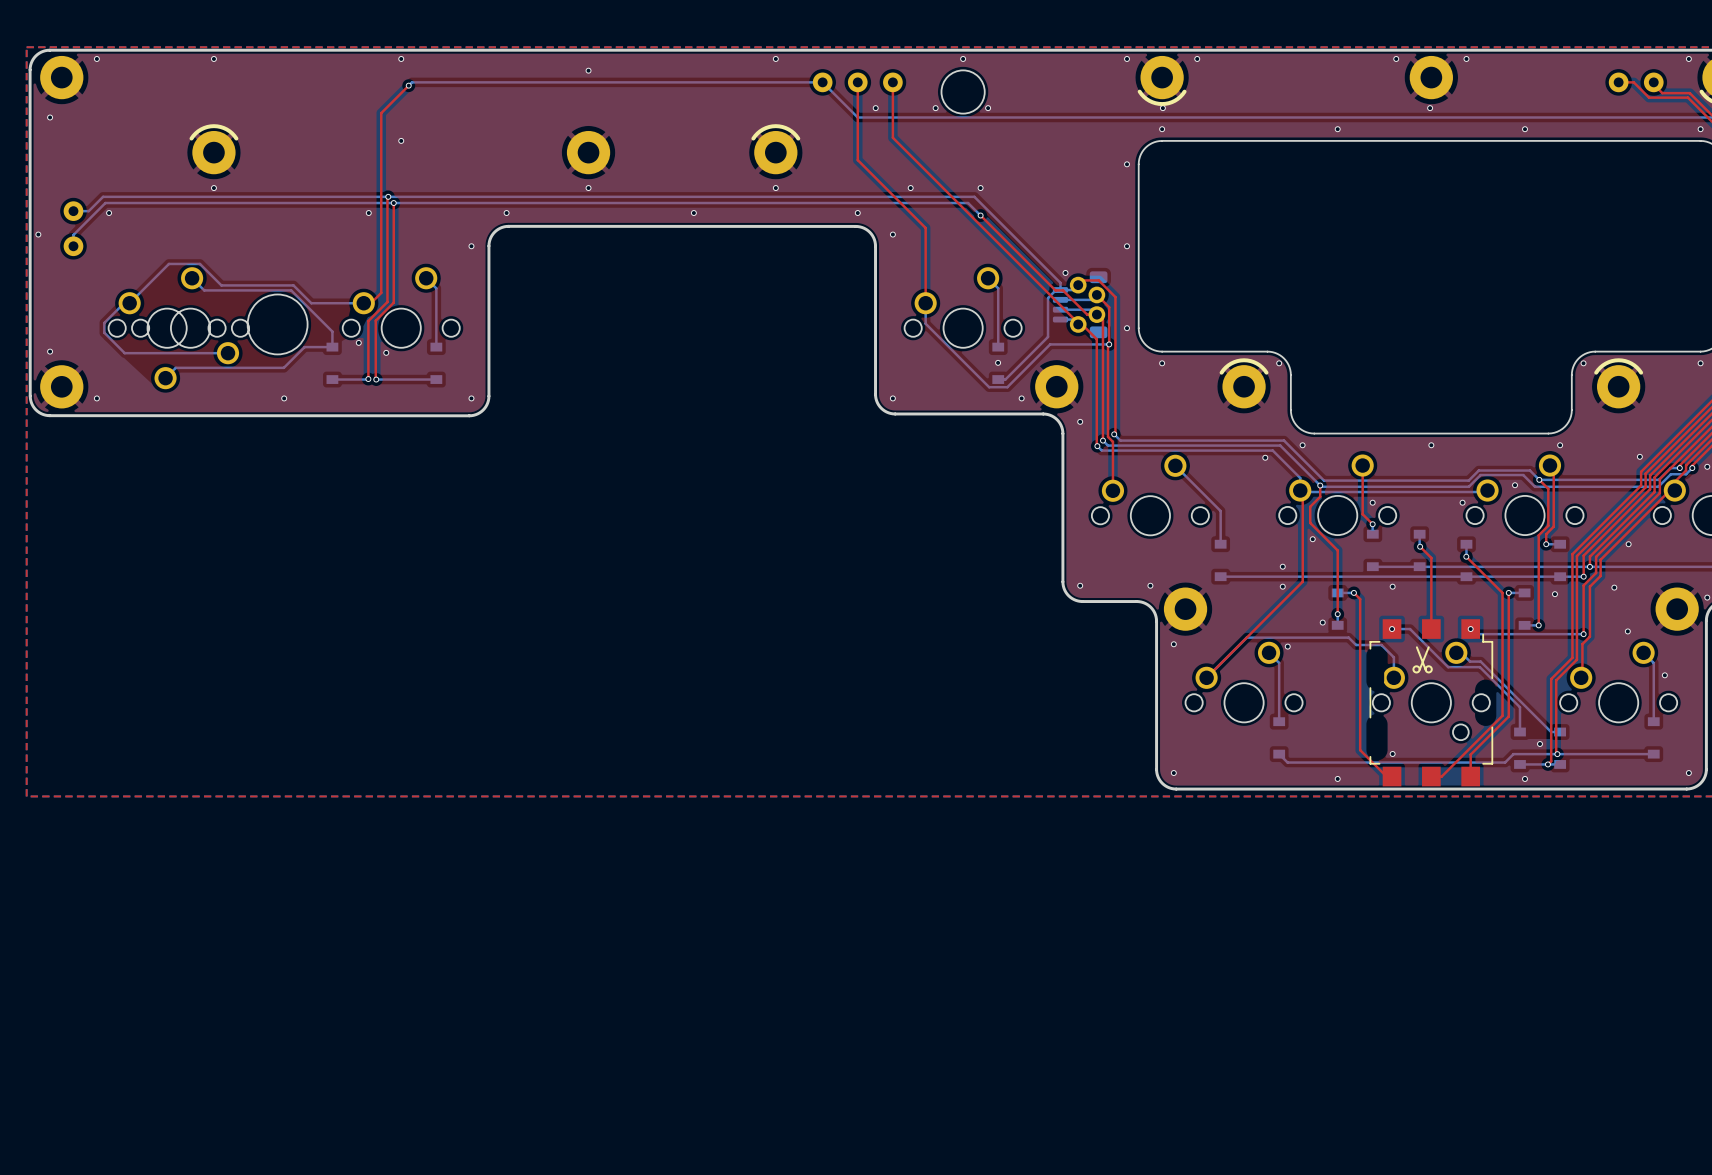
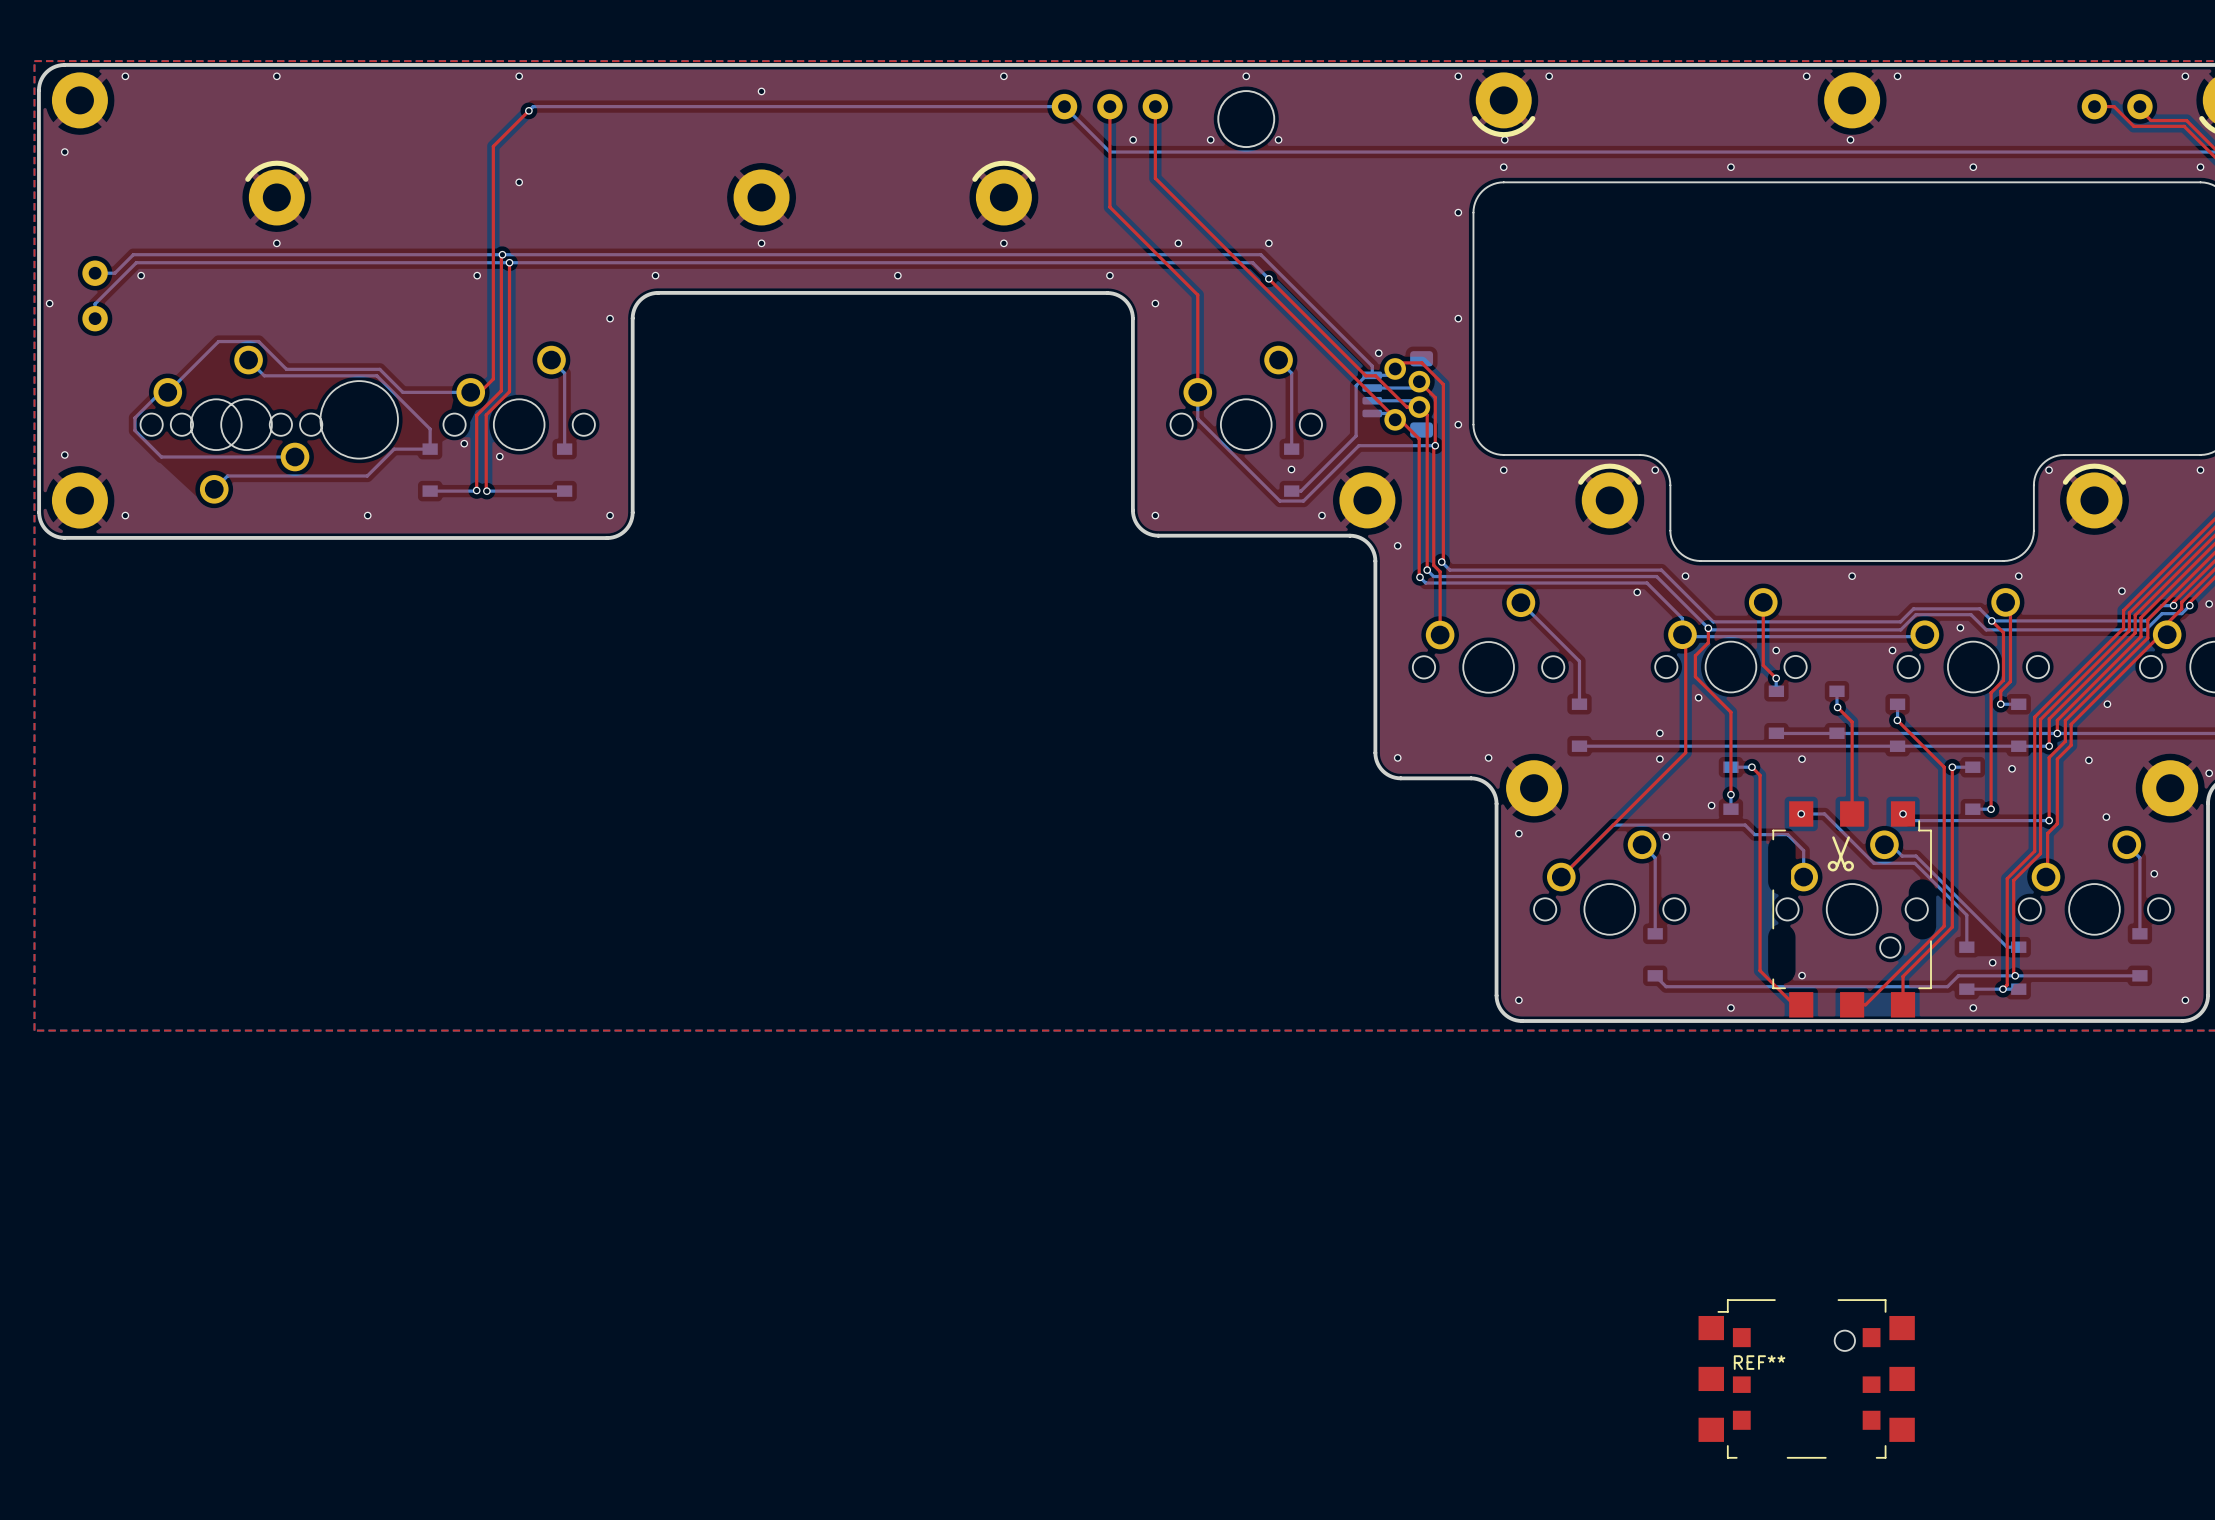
REF**: none -> (1806, 1378)

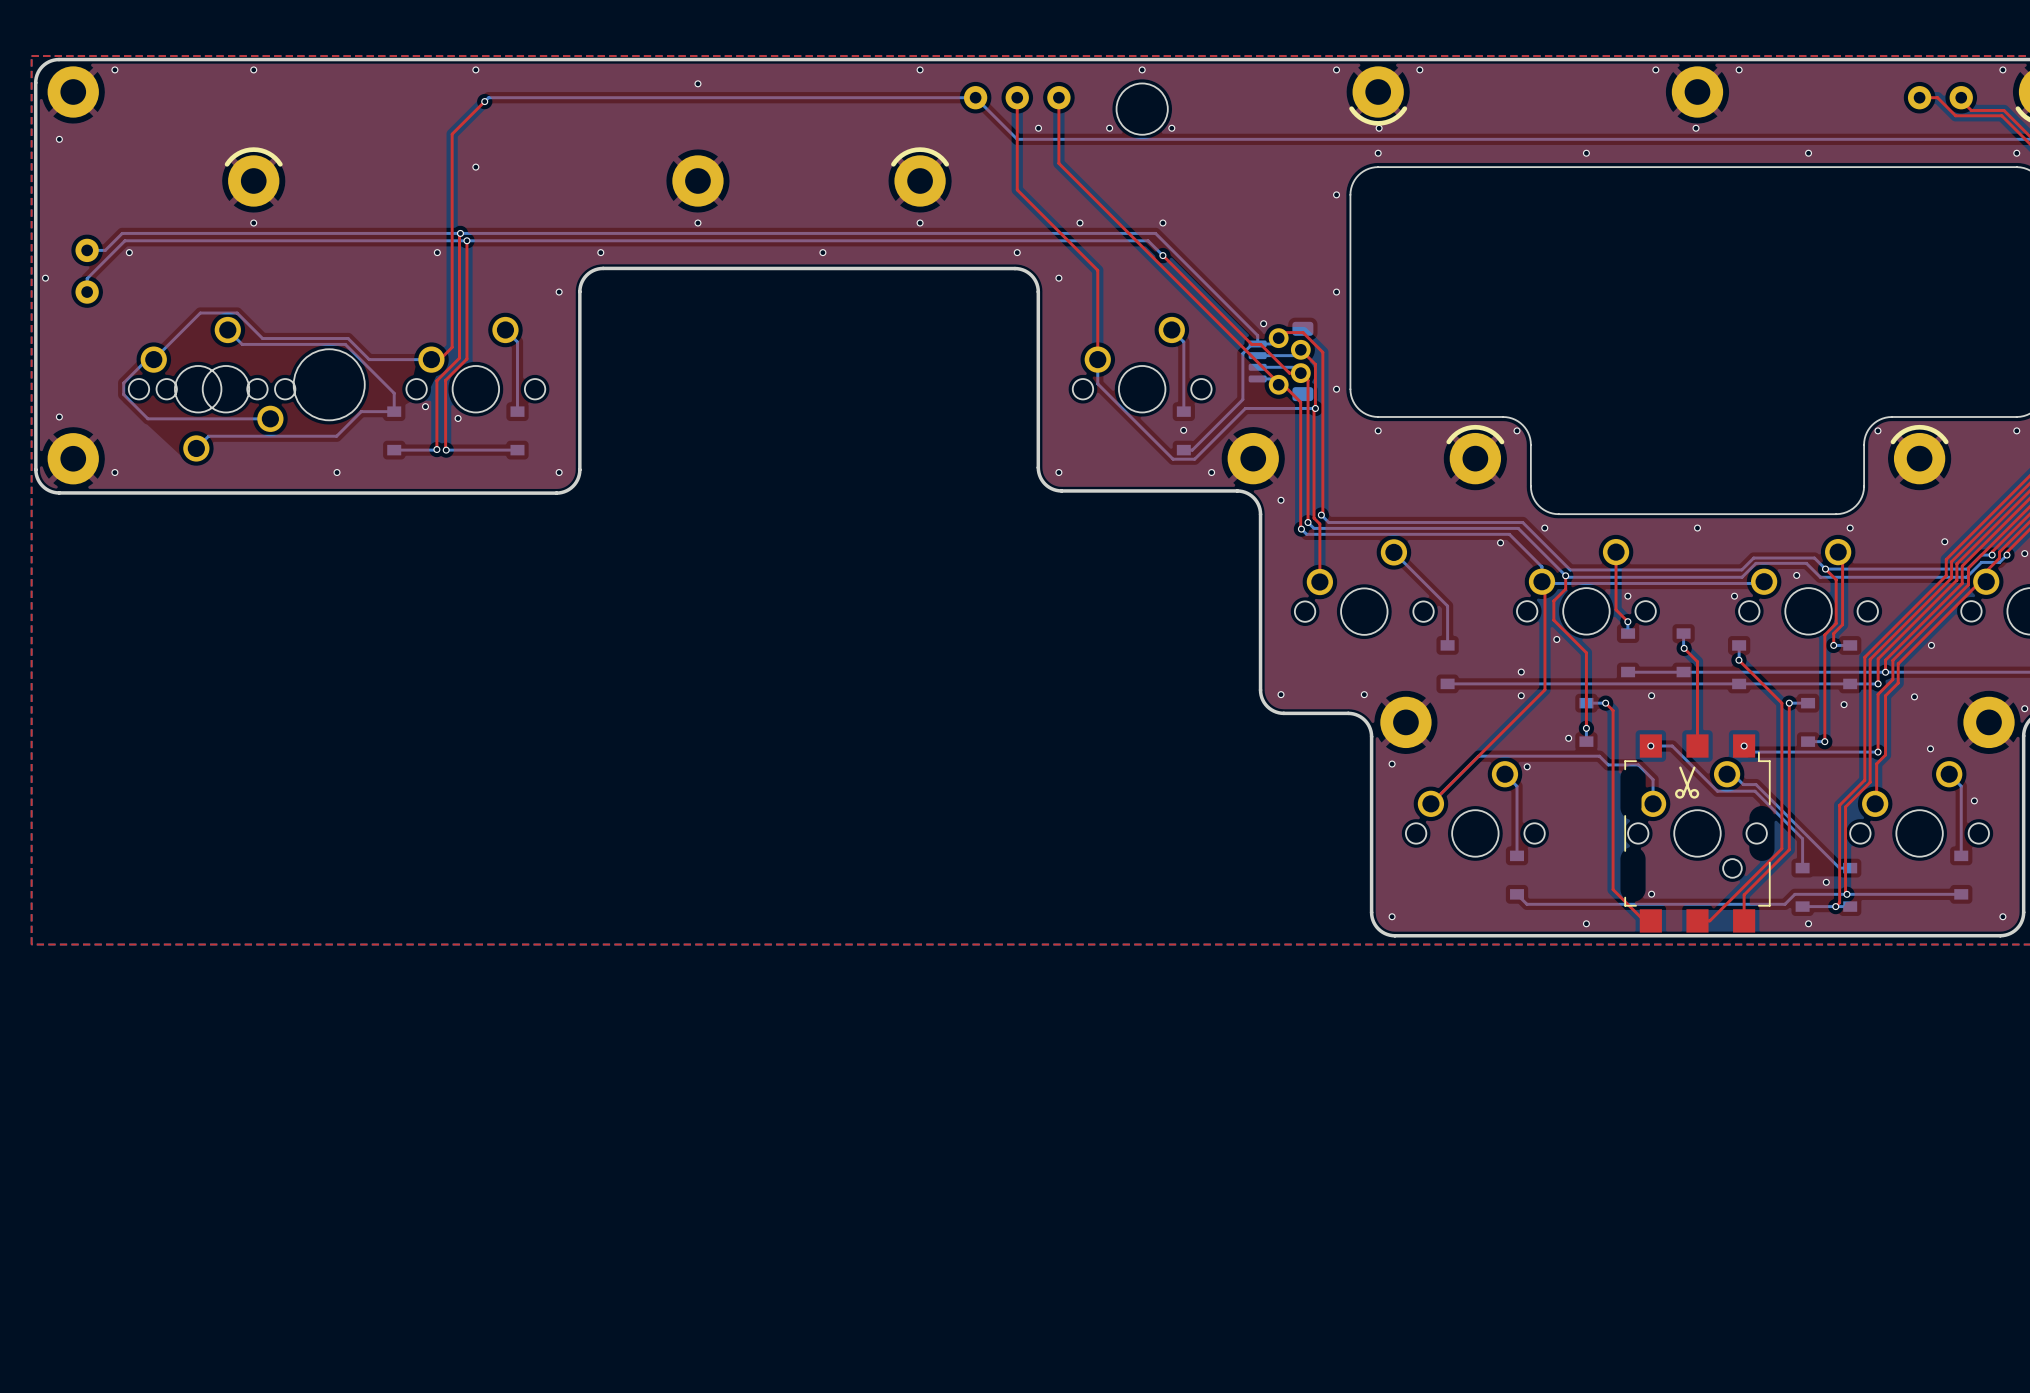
REF**: (1806, 1378) -> none

